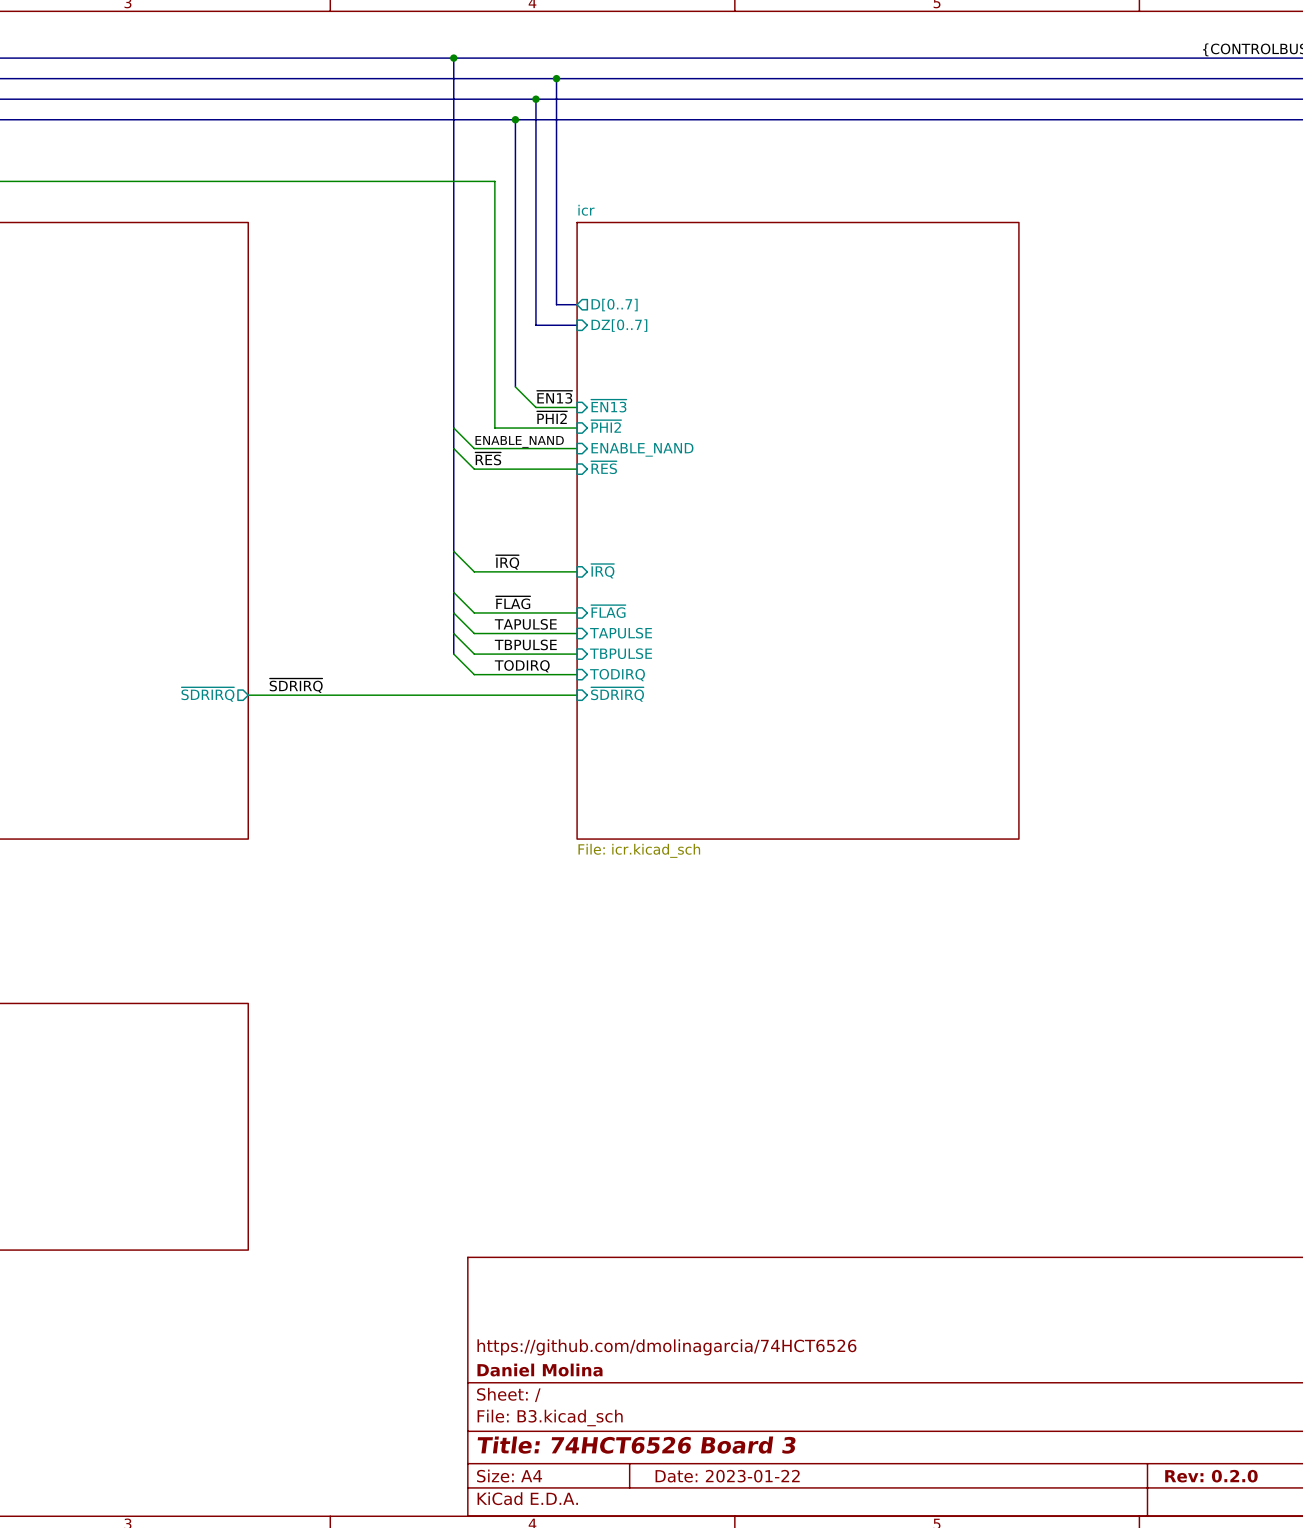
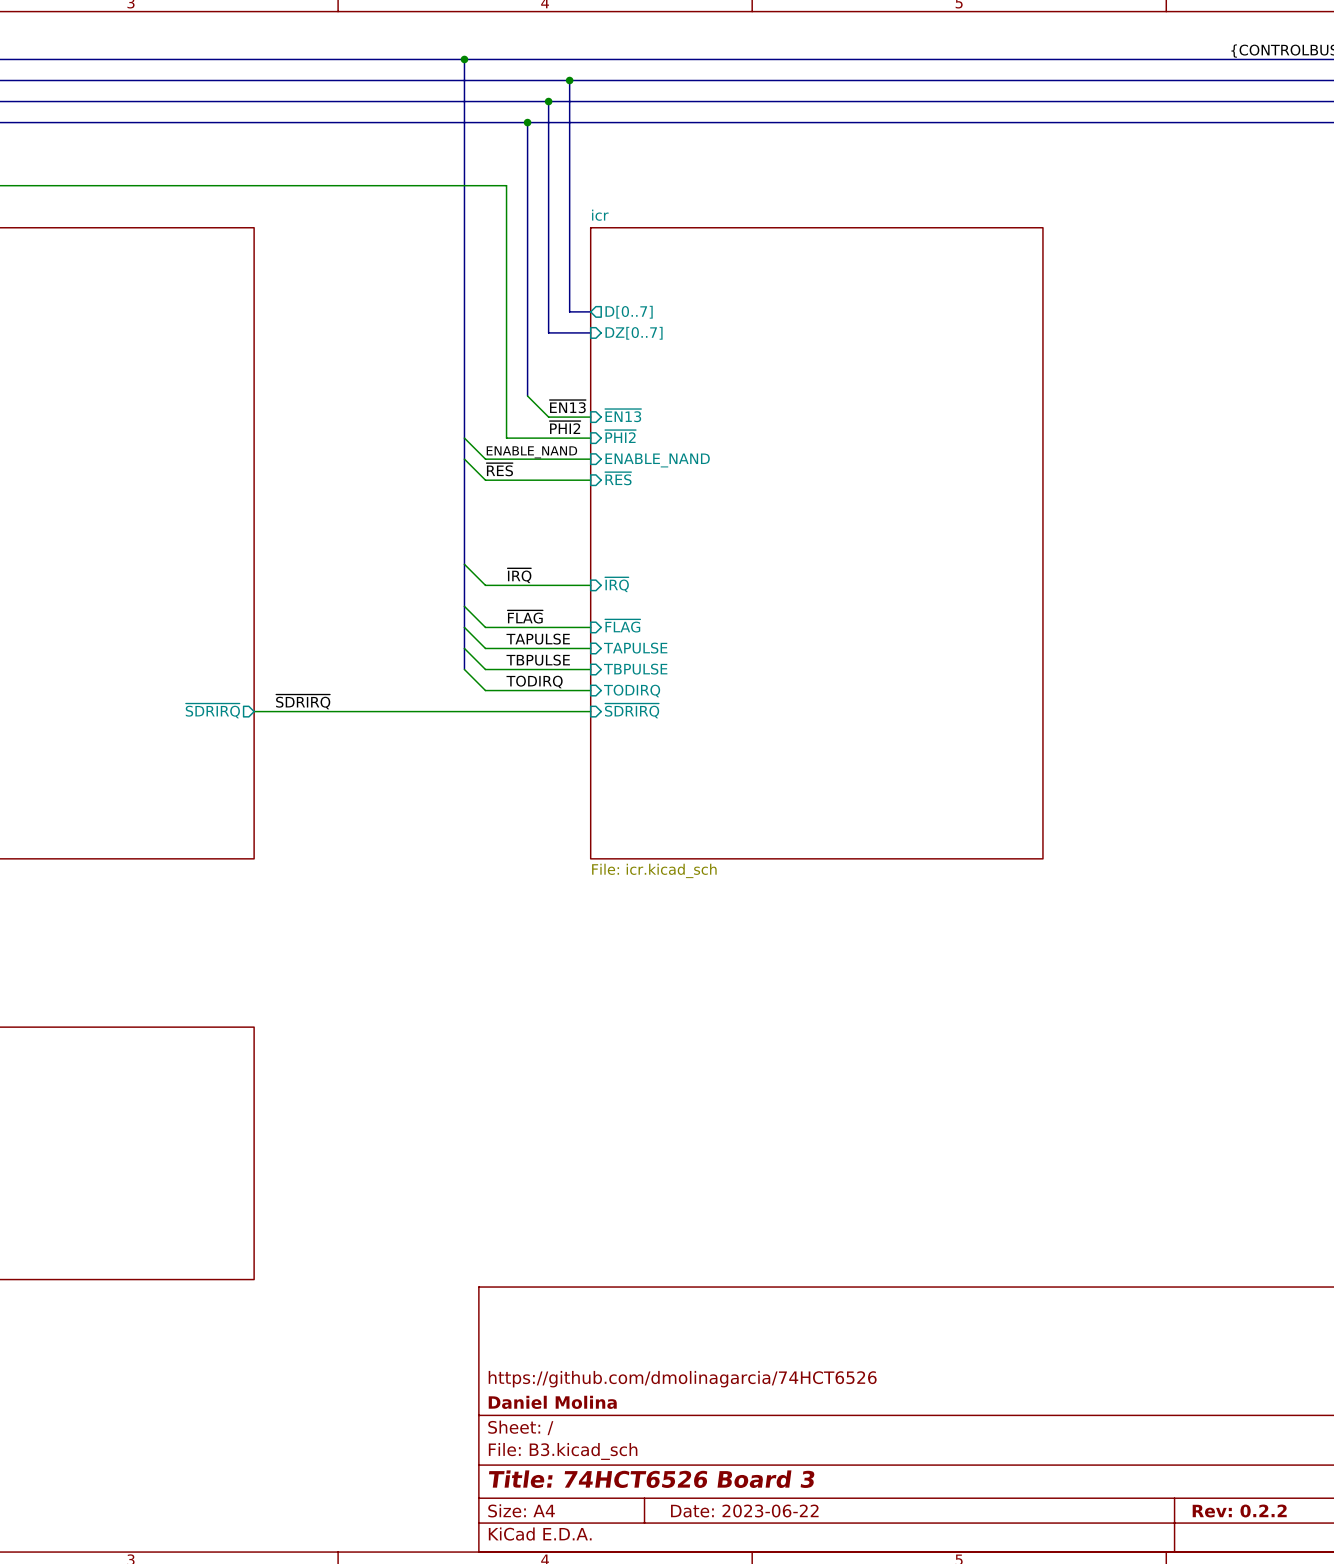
title block: Date: 2023-01-22 (727, 1476) -> Date: 2023-06-22 (744, 1511)
title block: Rev: 0.2.0 (1211, 1476) -> Rev: 0.2.2 (1239, 1511)

